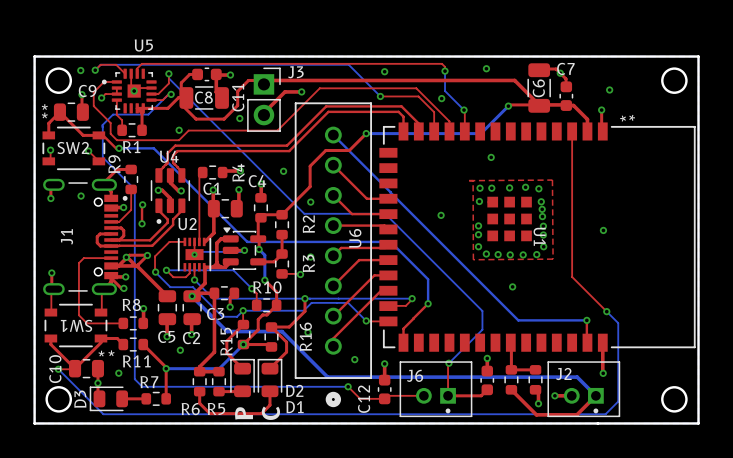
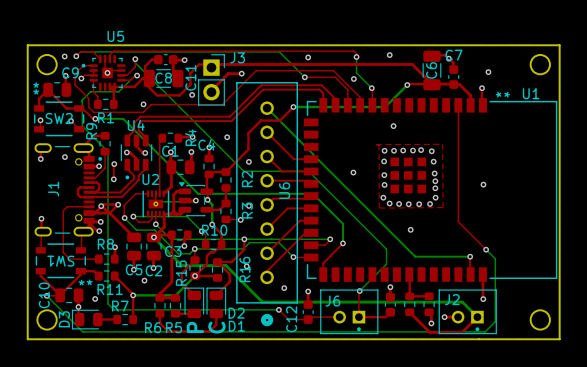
via: none -> (403, 150)
via: (509, 187) -> none
via: none -> (413, 150)
via: (542, 209) -> none
via: none -> (384, 175)
via: (478, 225) -> none
via: none -> (384, 184)
via: (478, 234) -> none
U1 name rotation: 0° (539, 236) -> 90° counterclockwise (531, 93)
U1 name position: U1 (539, 236) -> U1 (531, 93)

